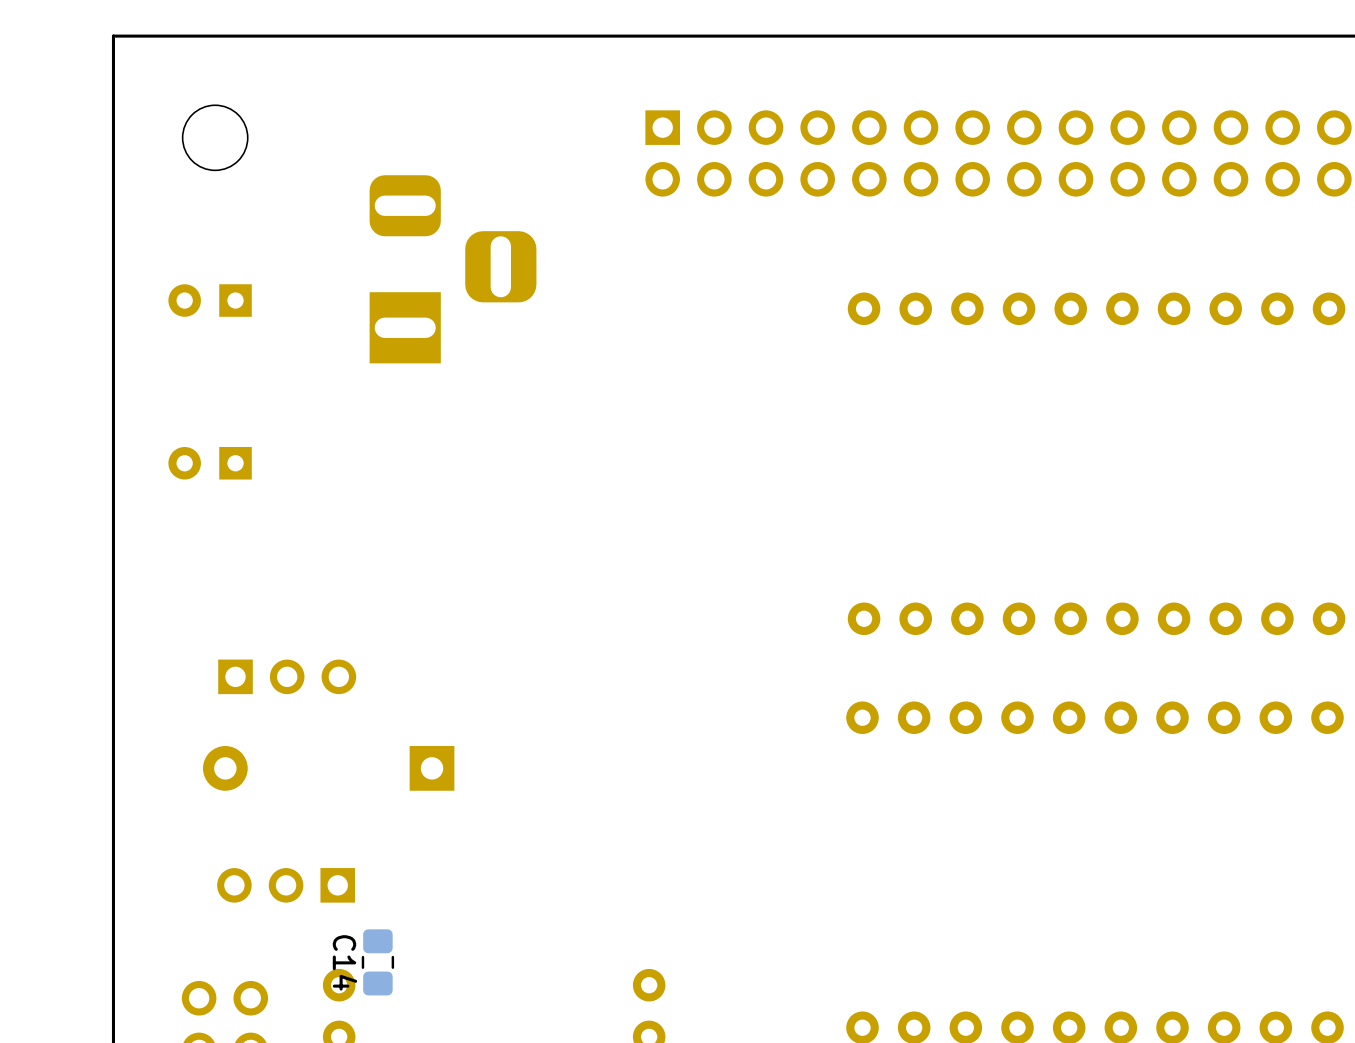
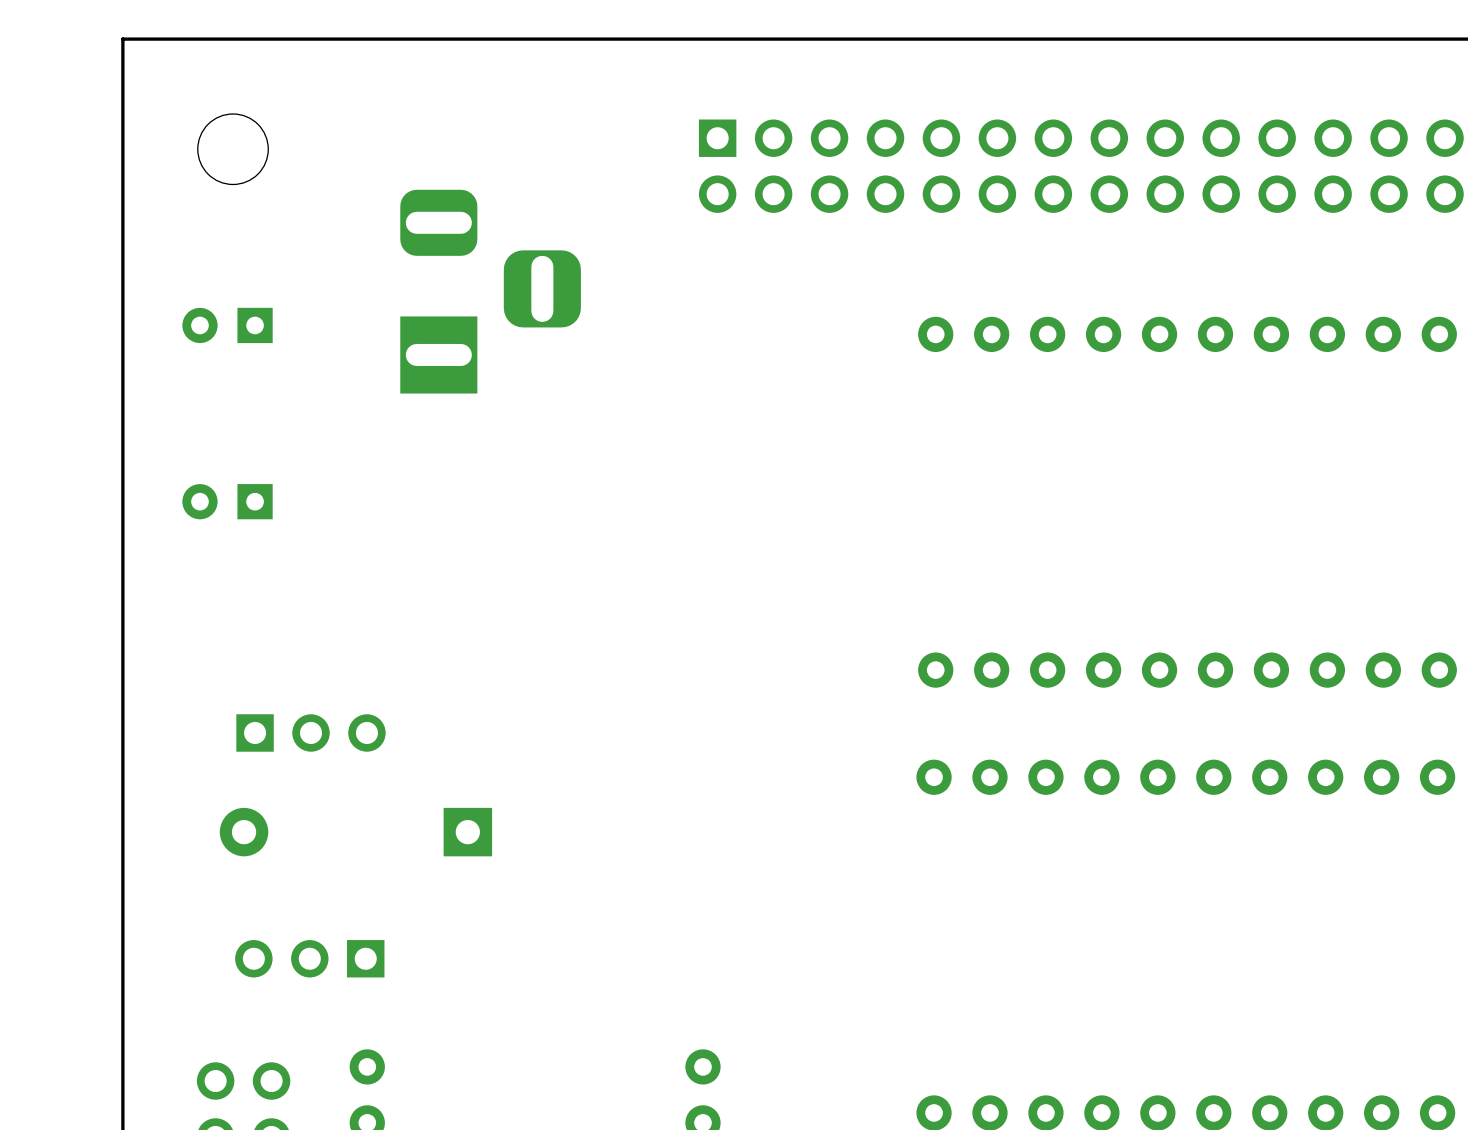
C14: (377, 962) -> none

